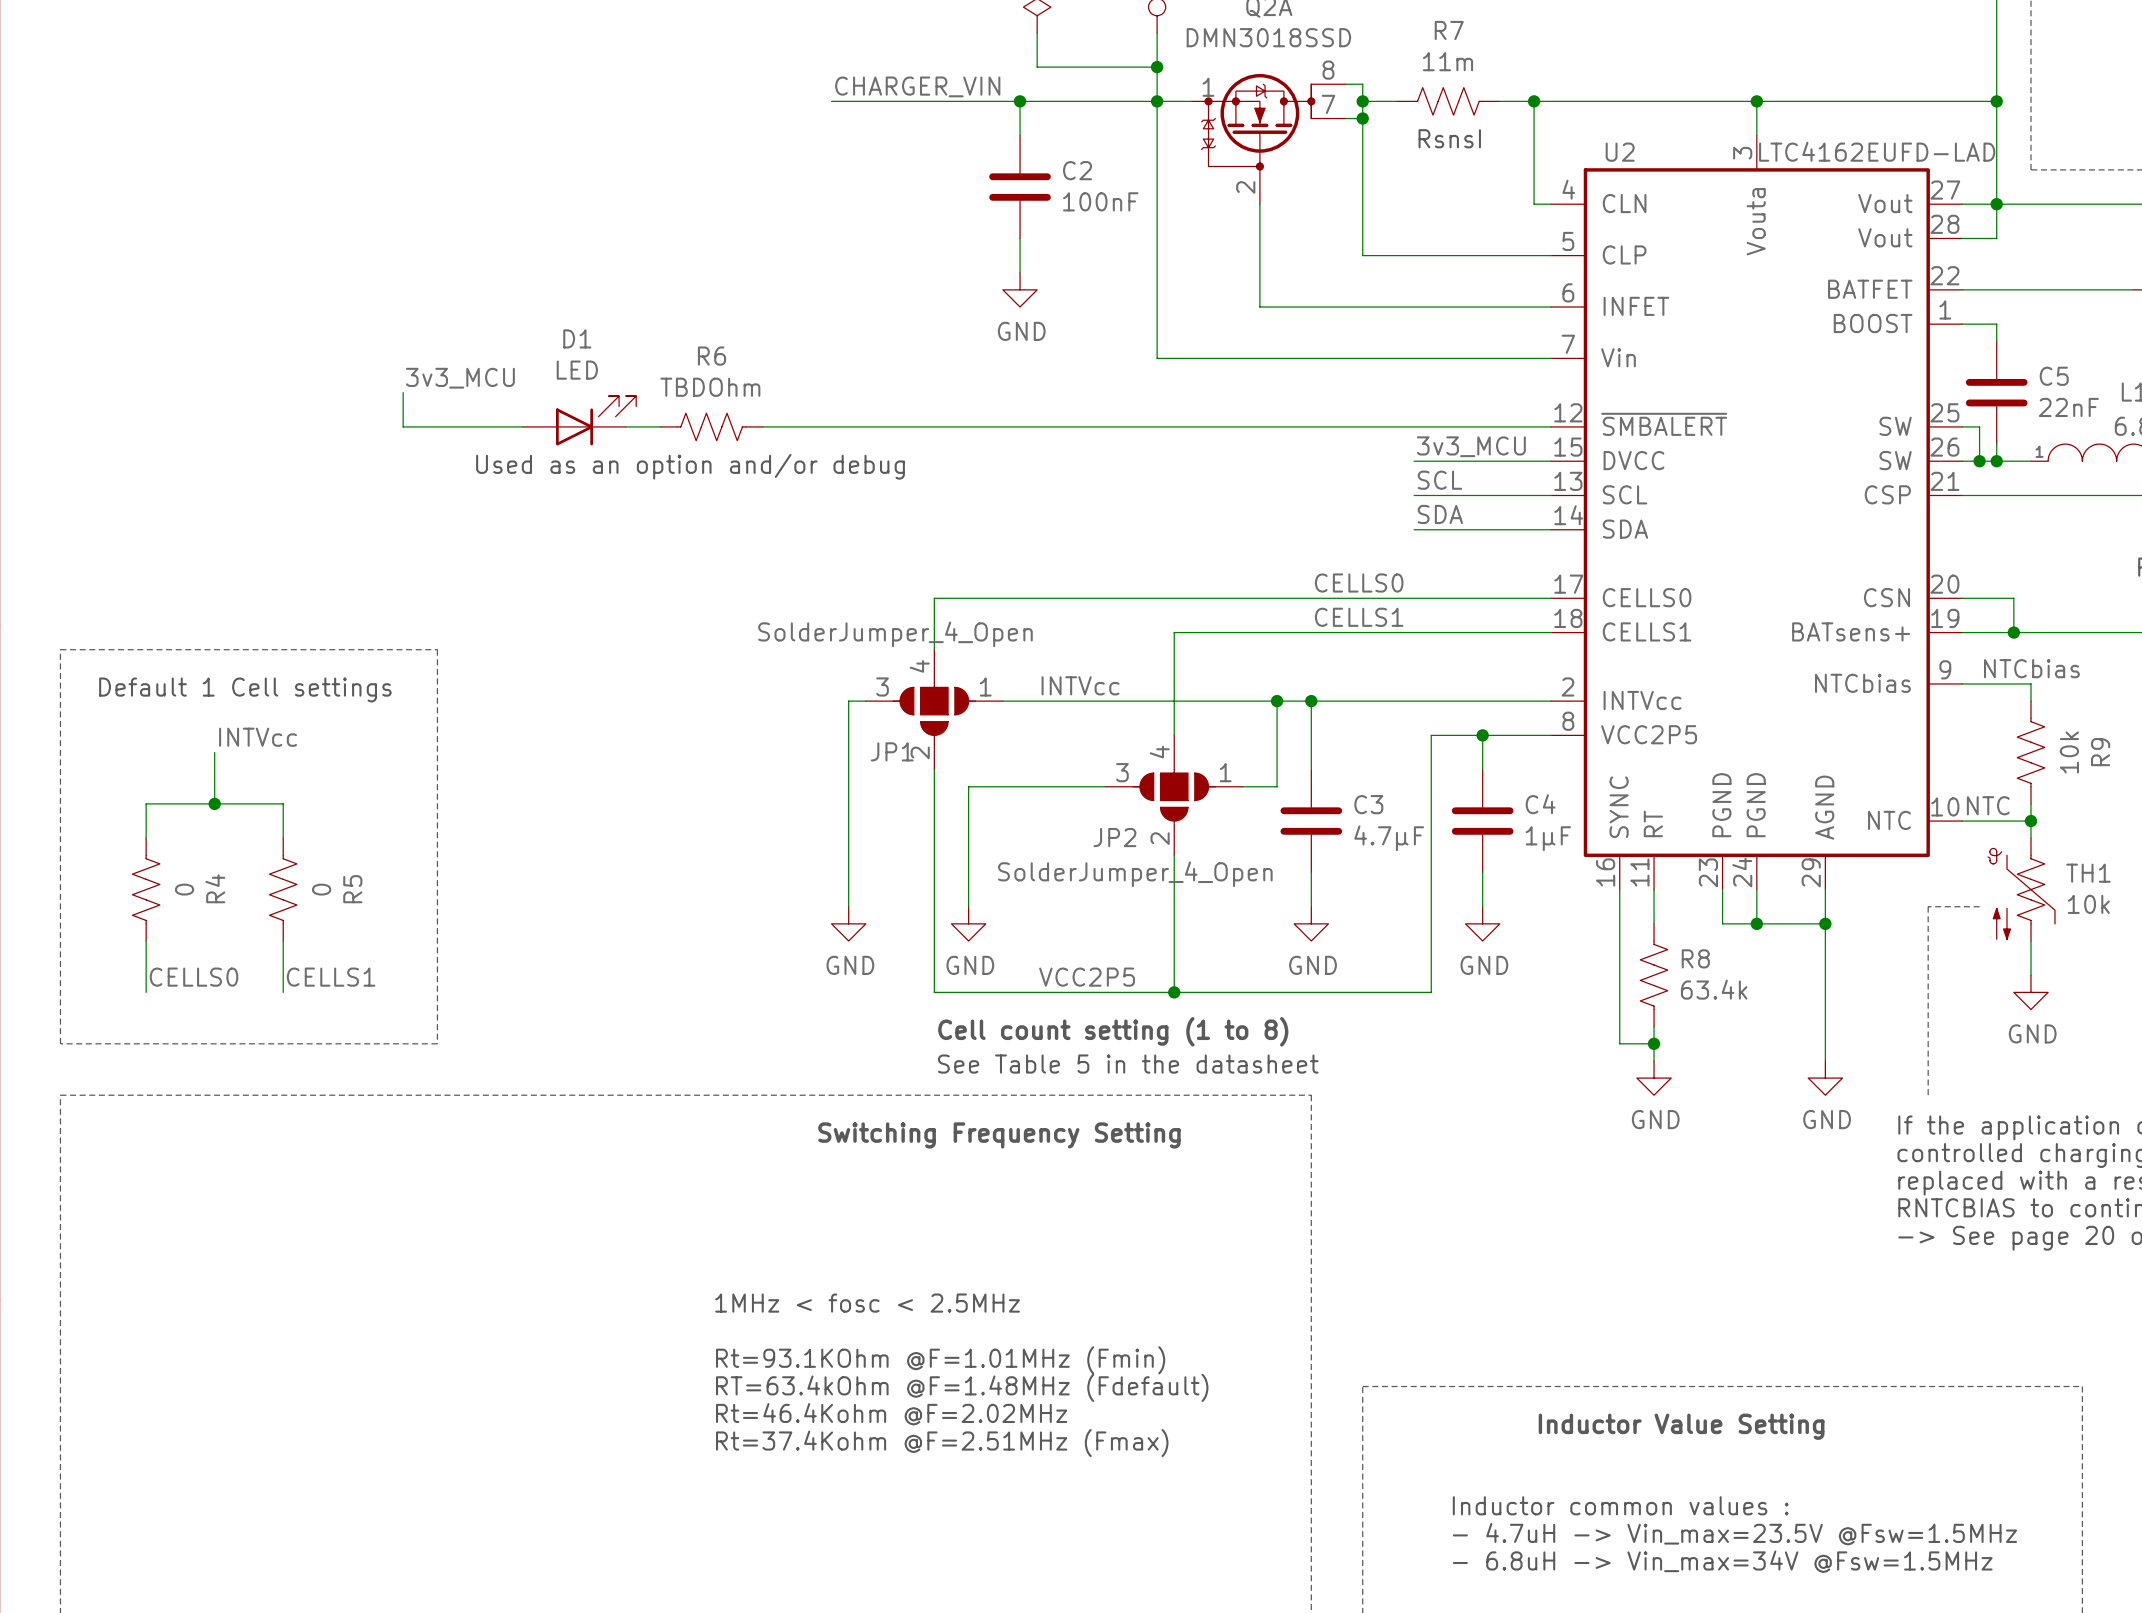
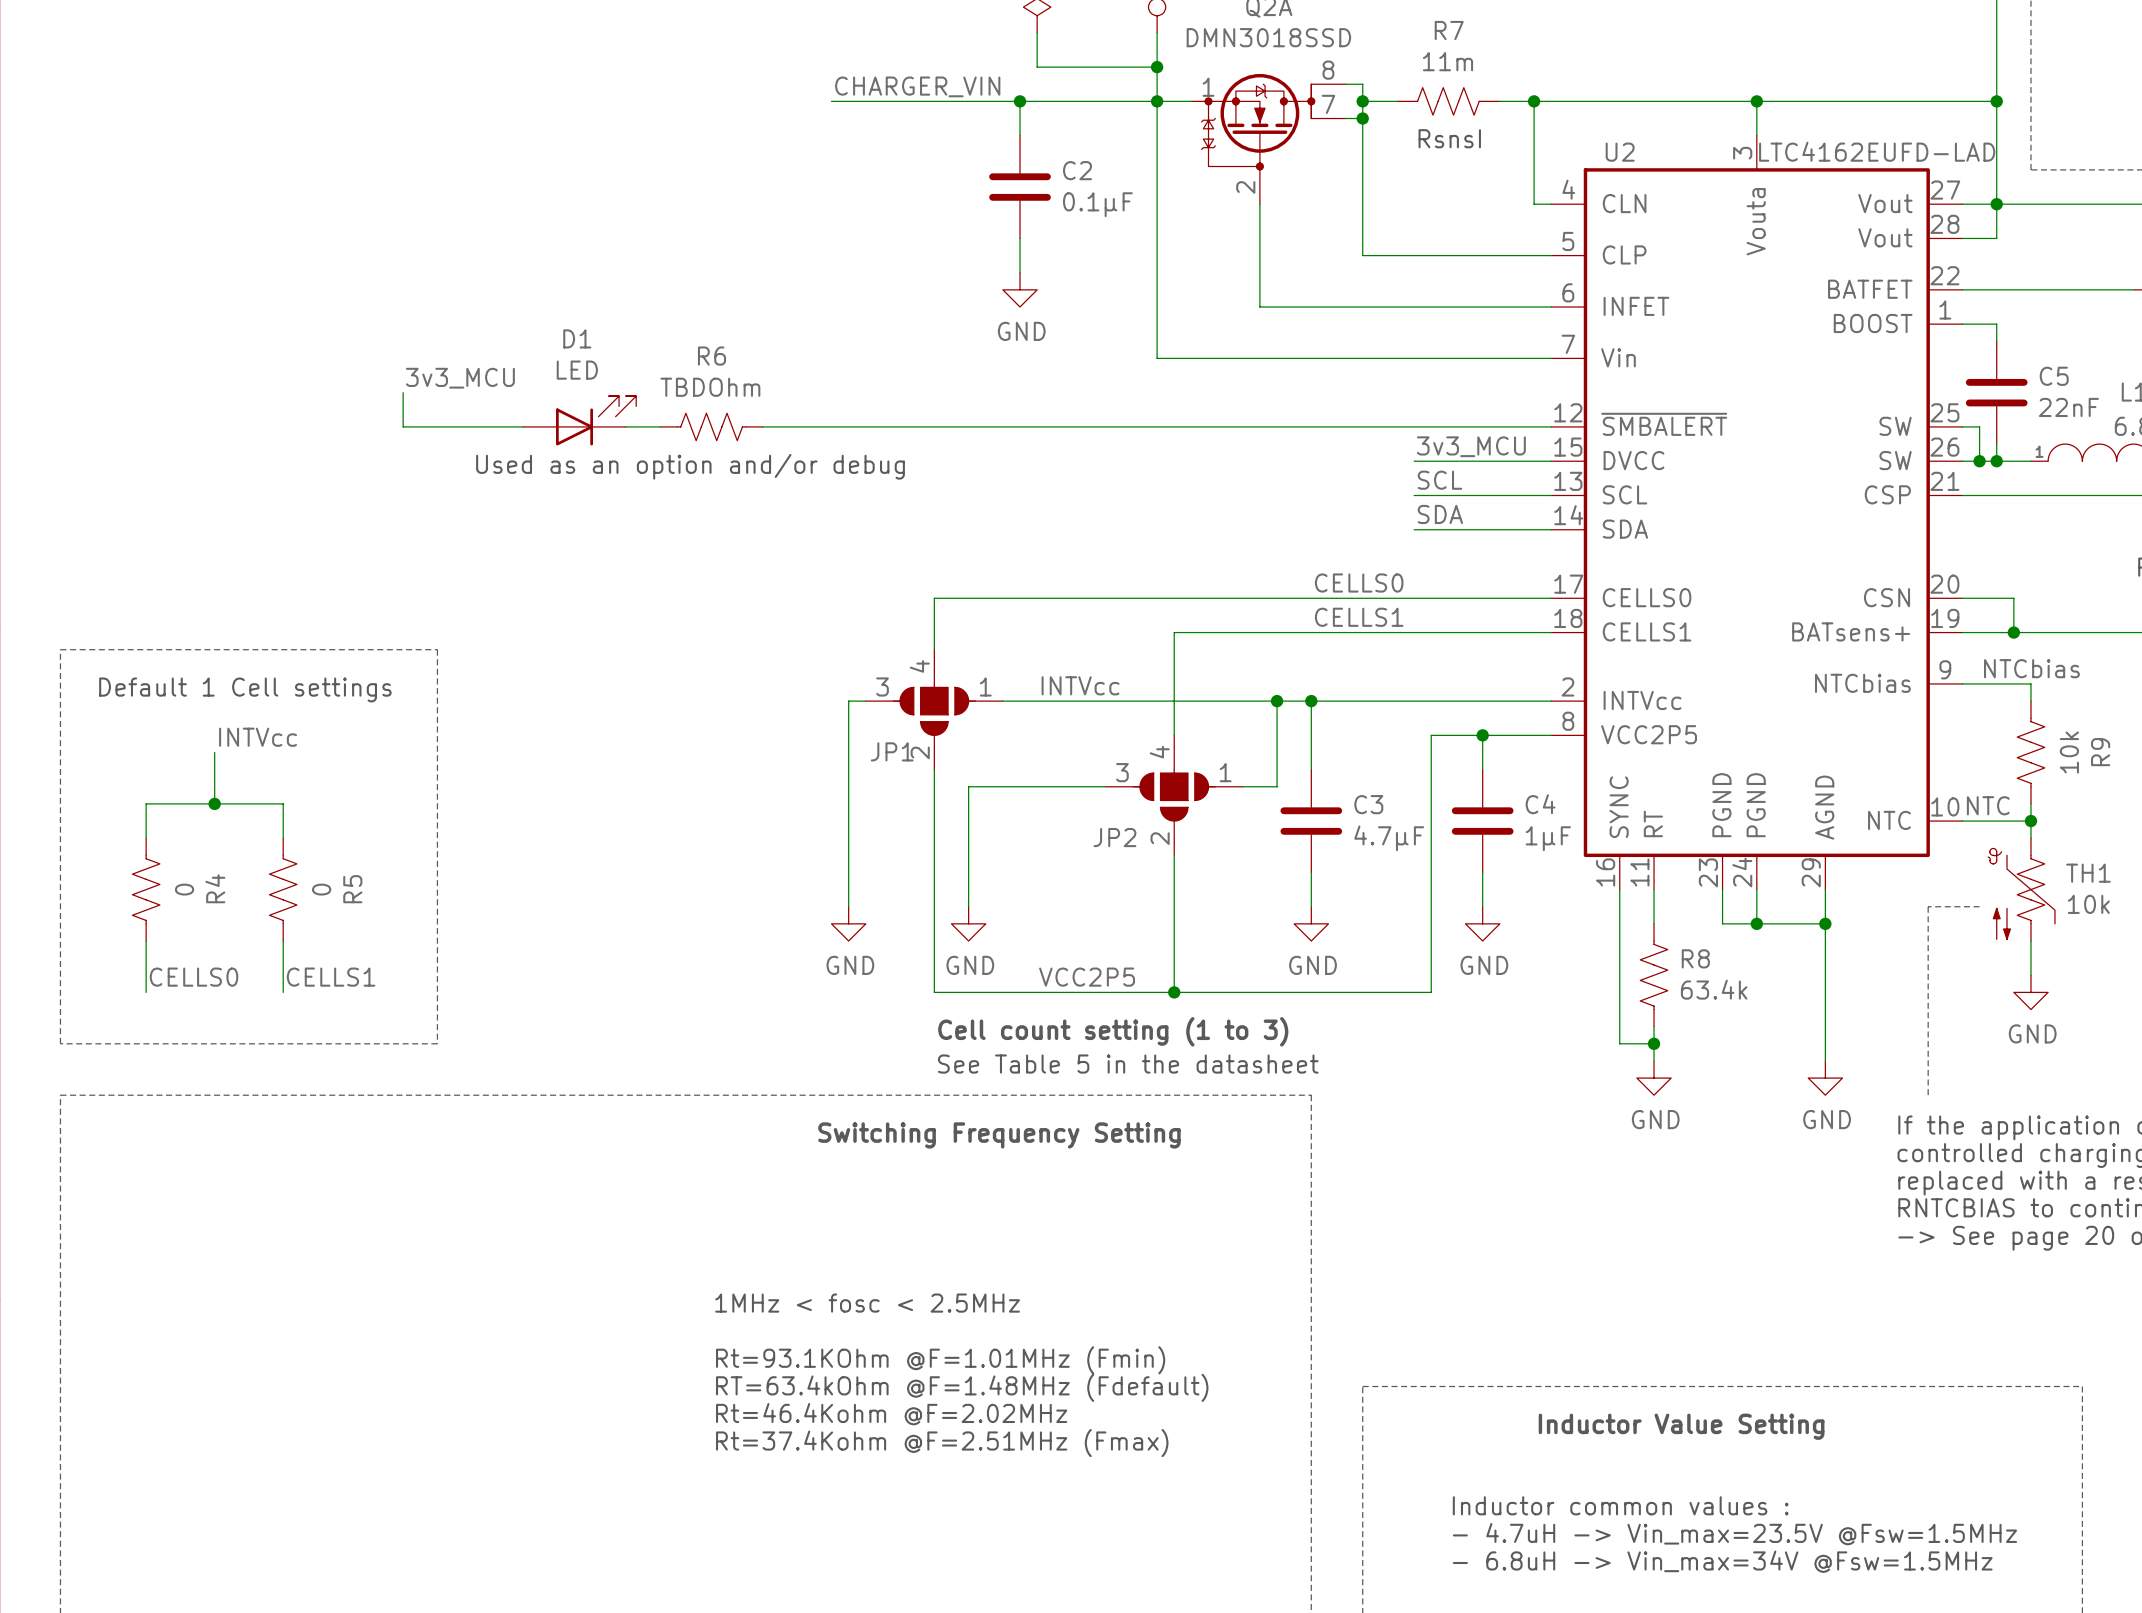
C2 value: 100nF (1100, 201) -> 0.1µF (1097, 204)
JP1 value: SolderJumper_4_Open (895, 634) -> none
JP2 value: SolderJumper_4_Open (1135, 874) -> none
text: Cell count setting (1 to 8) (1113, 1031) -> Cell count setting (1 to 3) (1113, 1031)

